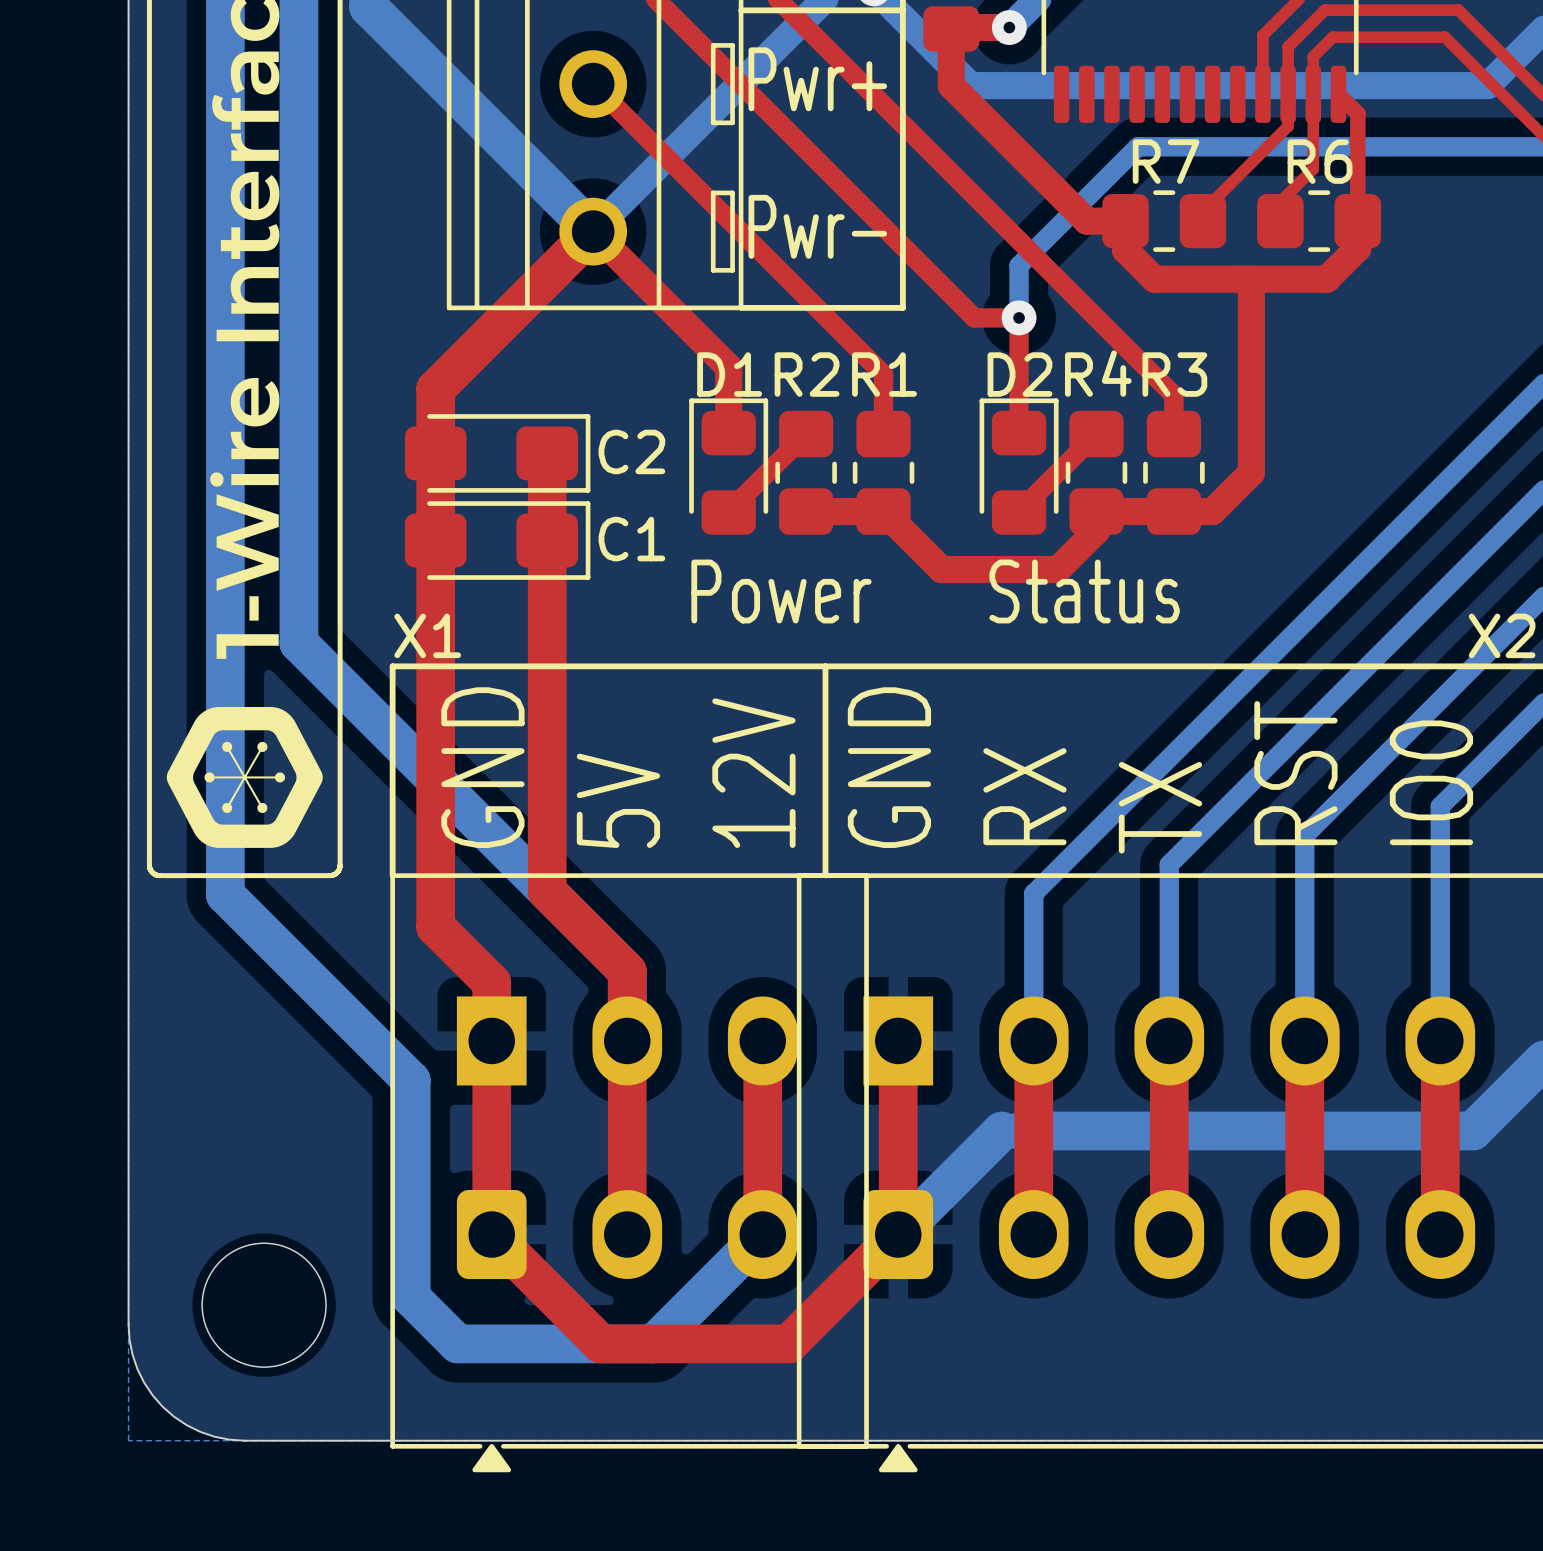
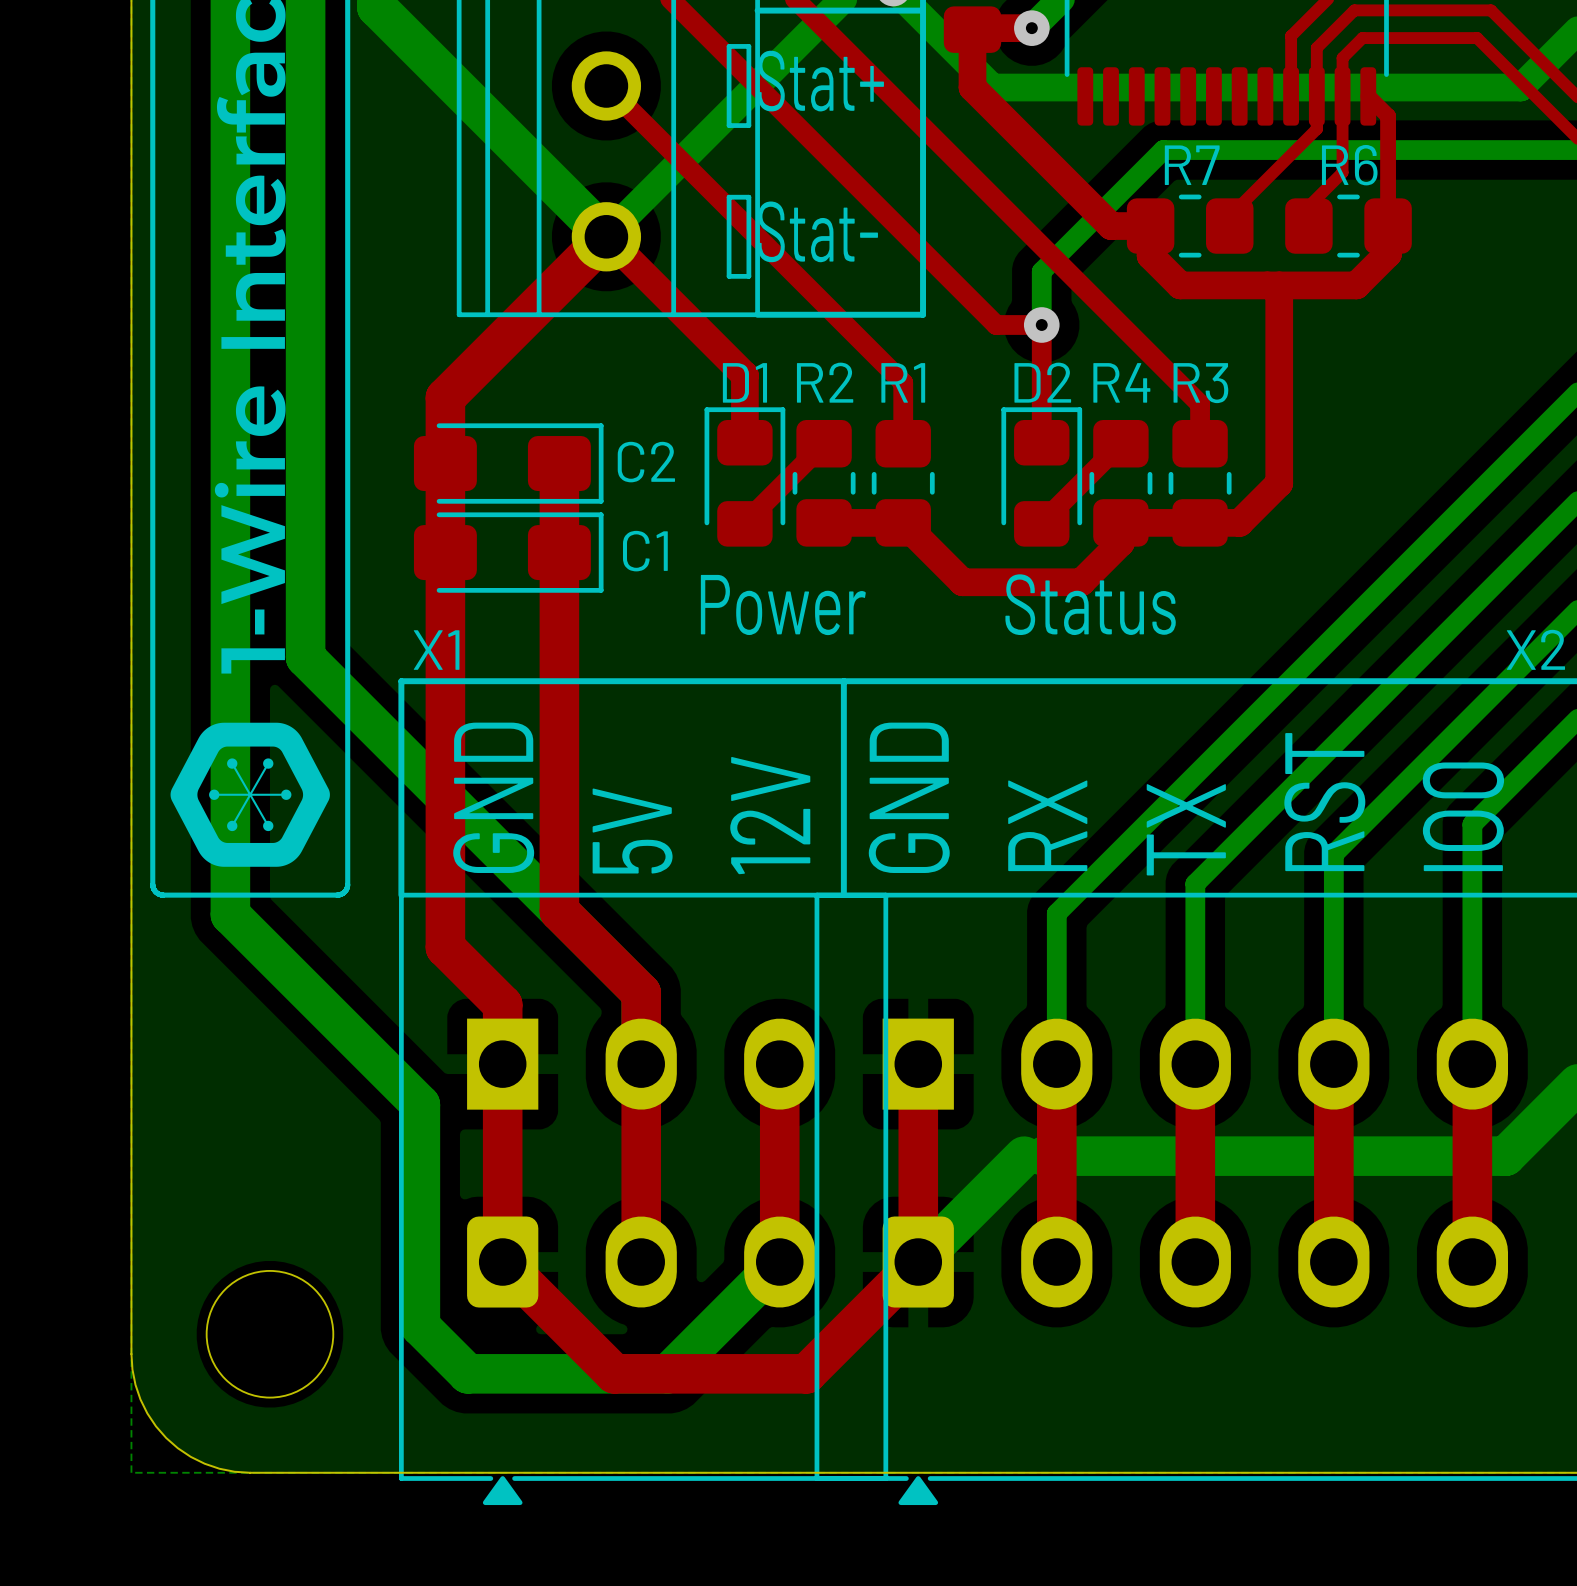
text: Pwr+ (817, 79) -> Stat+ (820, 81)
text: Pwr- (817, 226) -> Stat- (817, 231)

